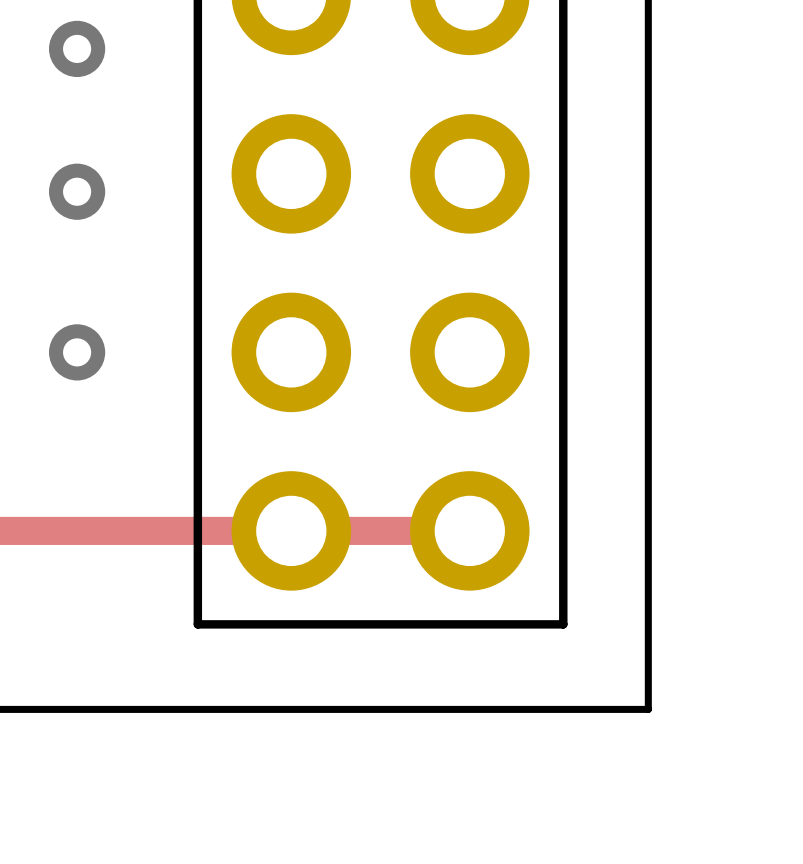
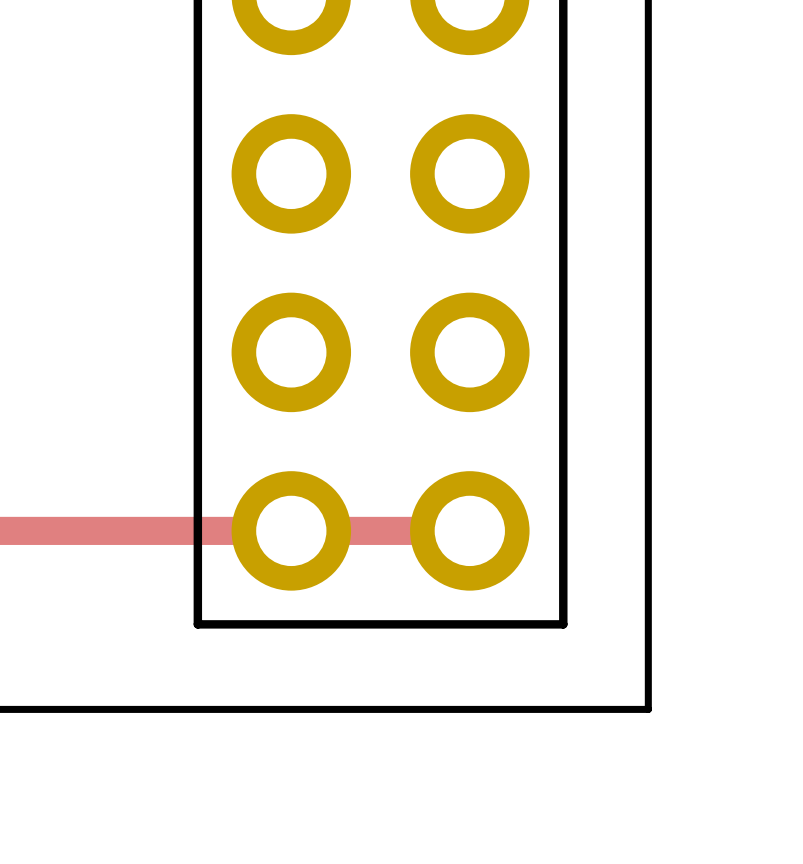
via: (77, 48) -> none
via: (77, 191) -> none
via: (77, 352) -> none

